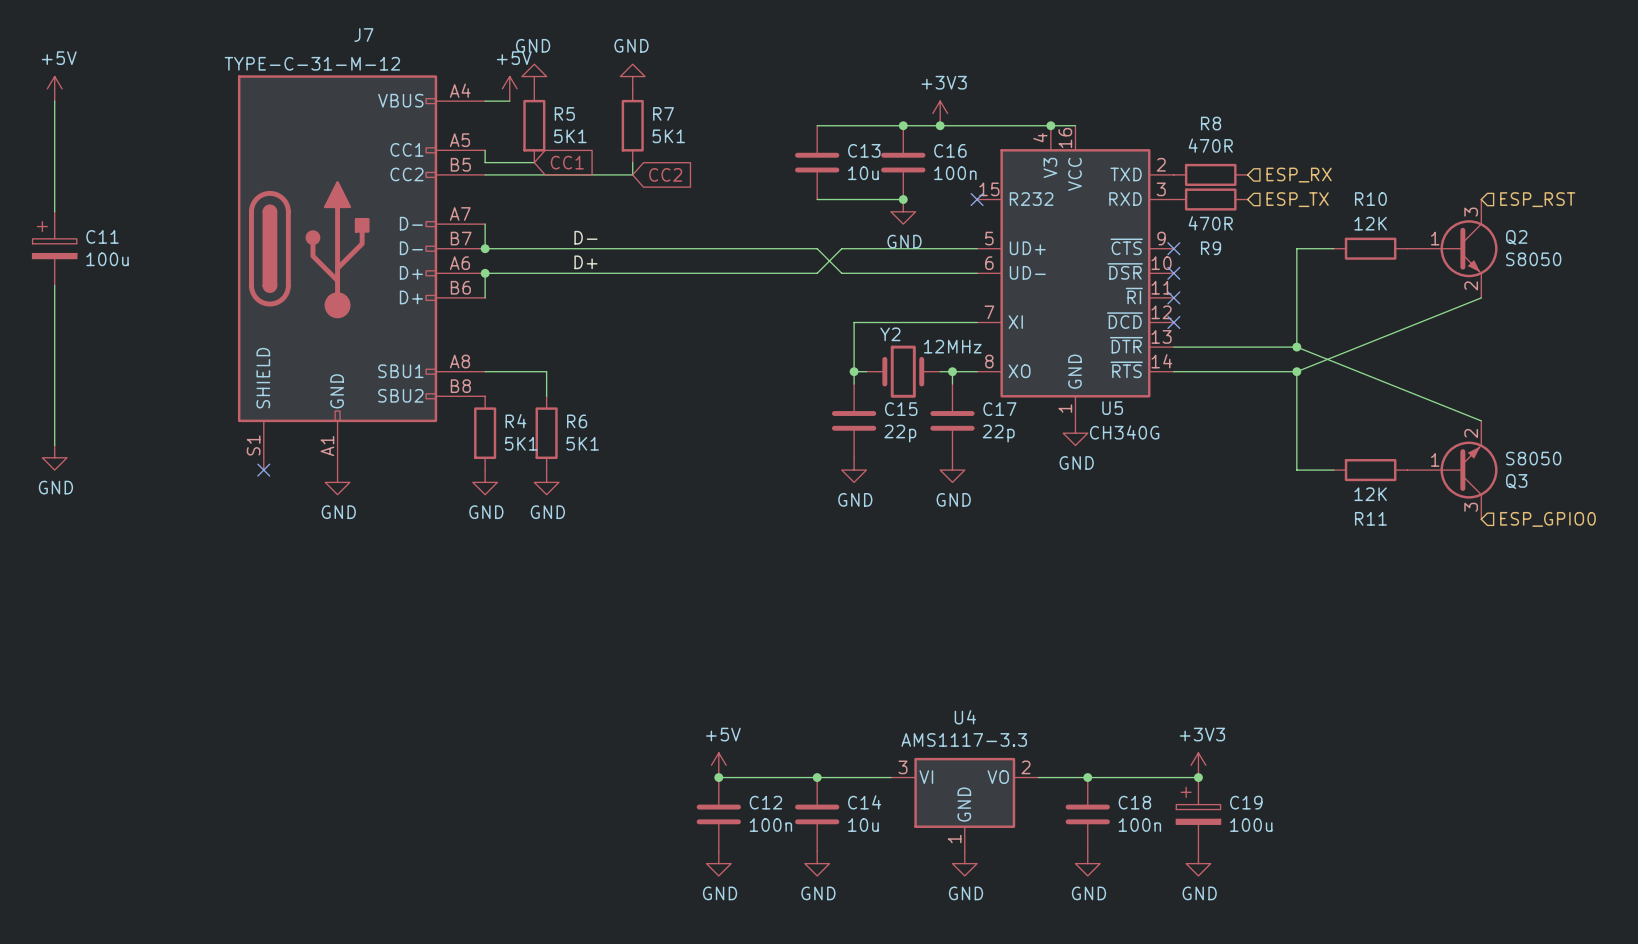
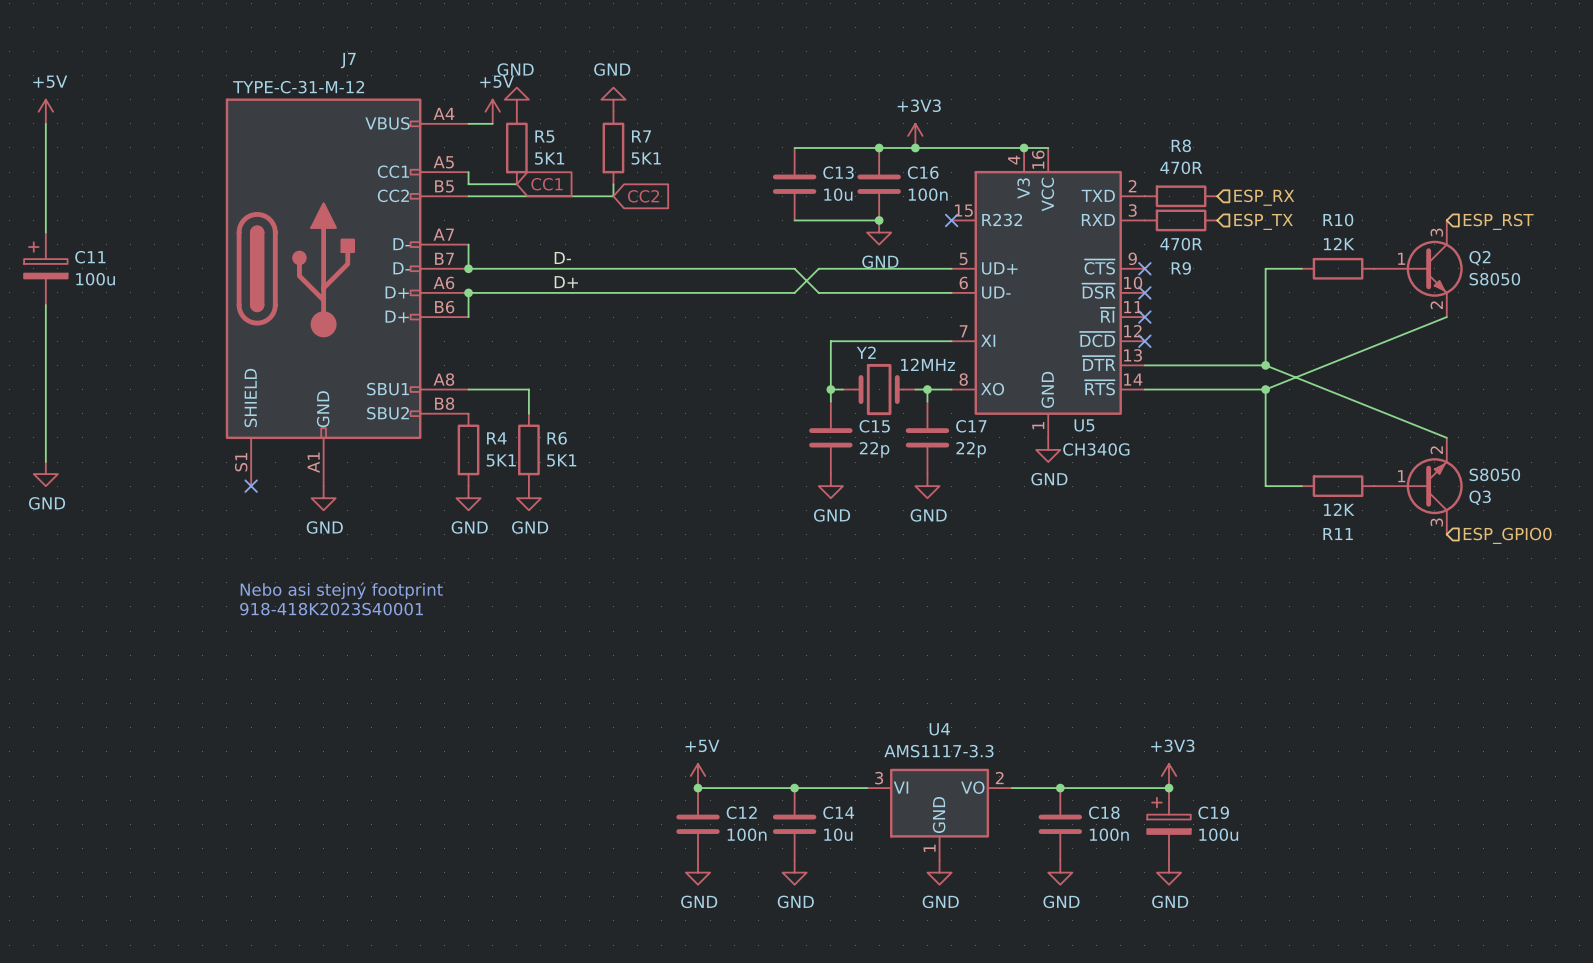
text: none -> Nebo asi stejný footprint (341, 590)
text: none -> 918-418K2023S40001 (331, 609)

